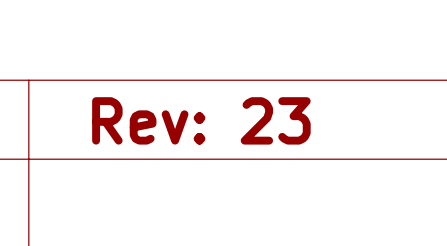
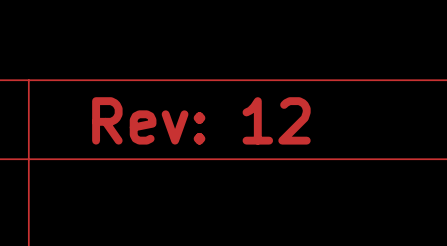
title block: Rev: 23 (201, 120) -> Rev: 12 (201, 120)

